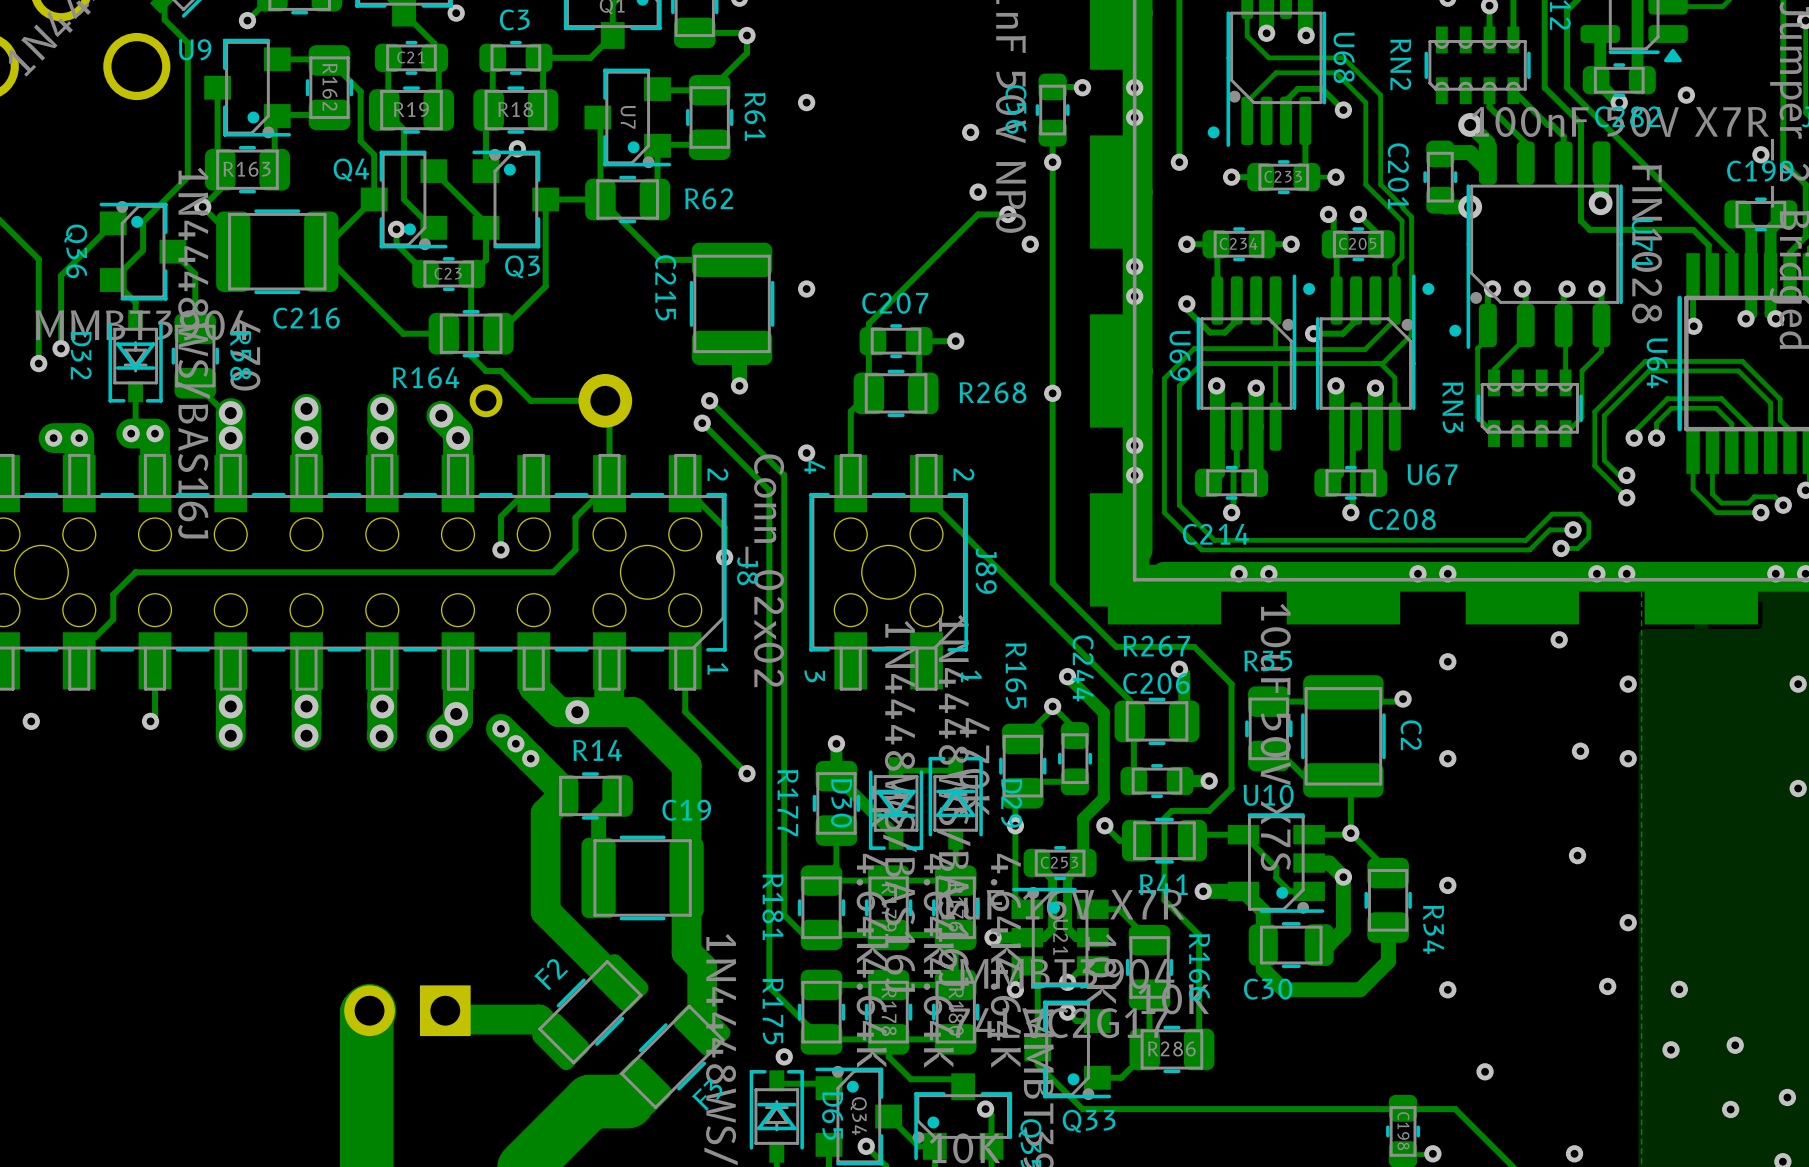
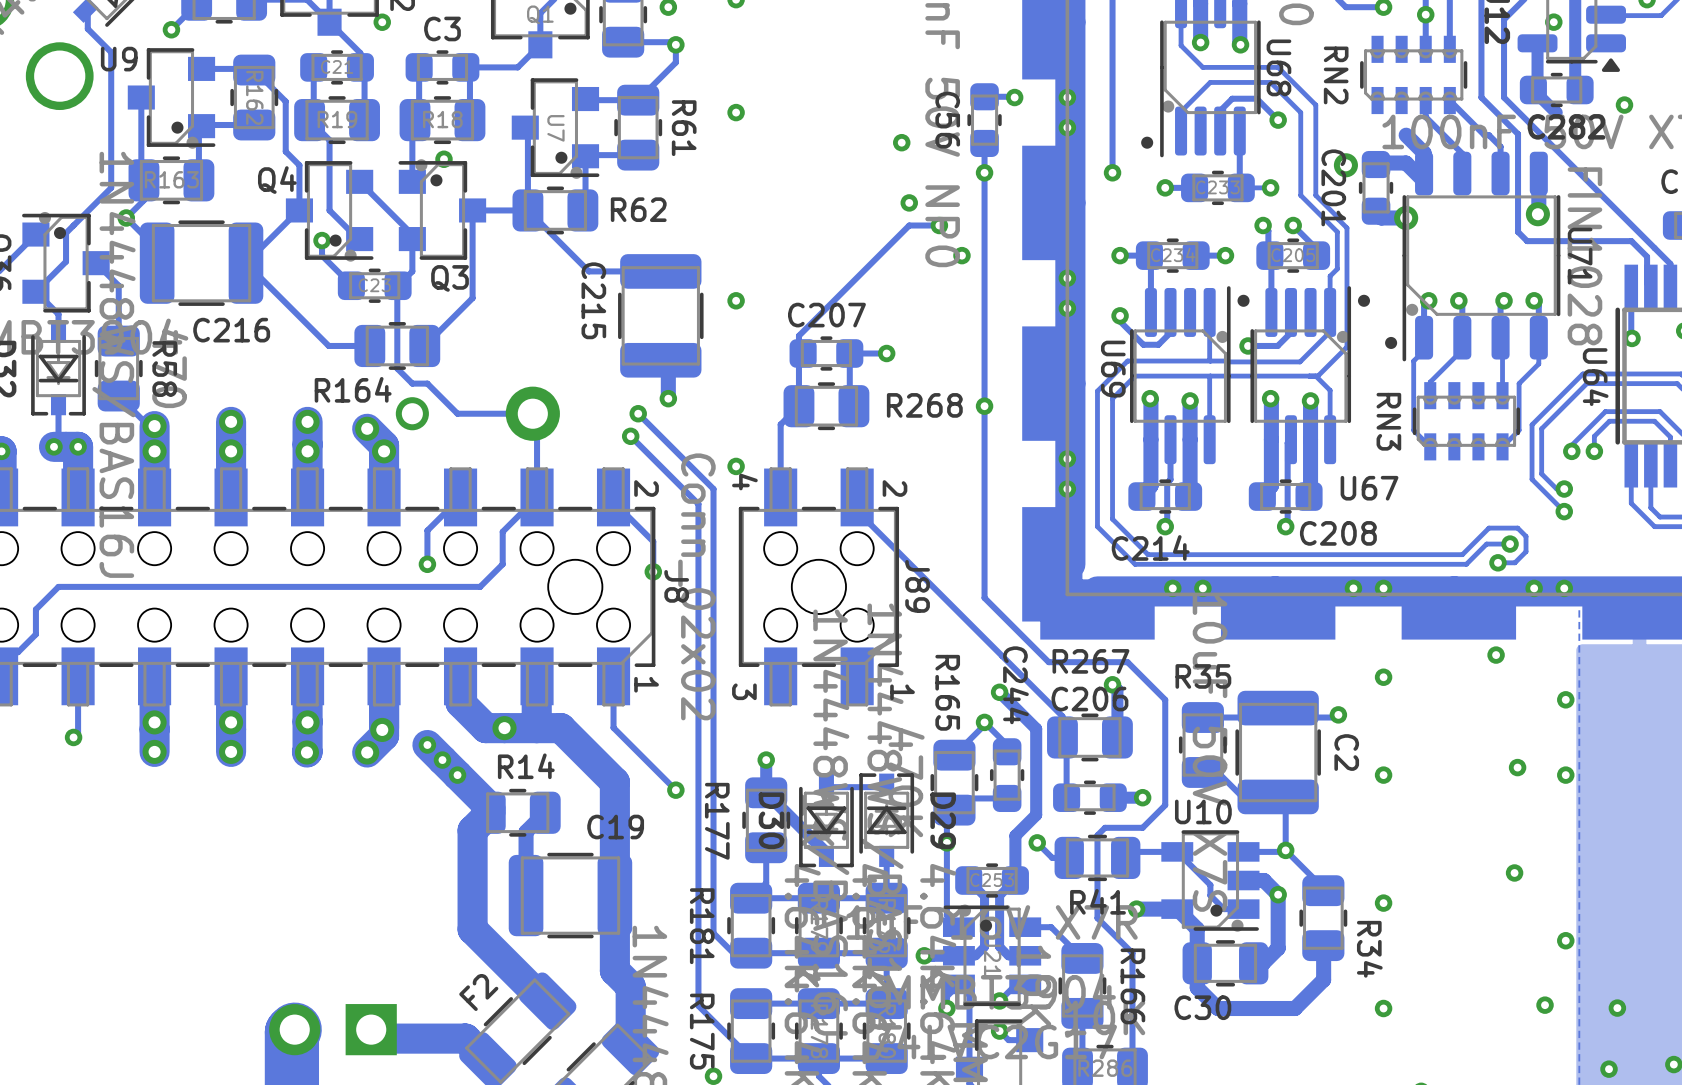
via: none -> (1553, 22)
via: (1619, 102) -> none
via position: (1470, 124) -> (1345, 165)

